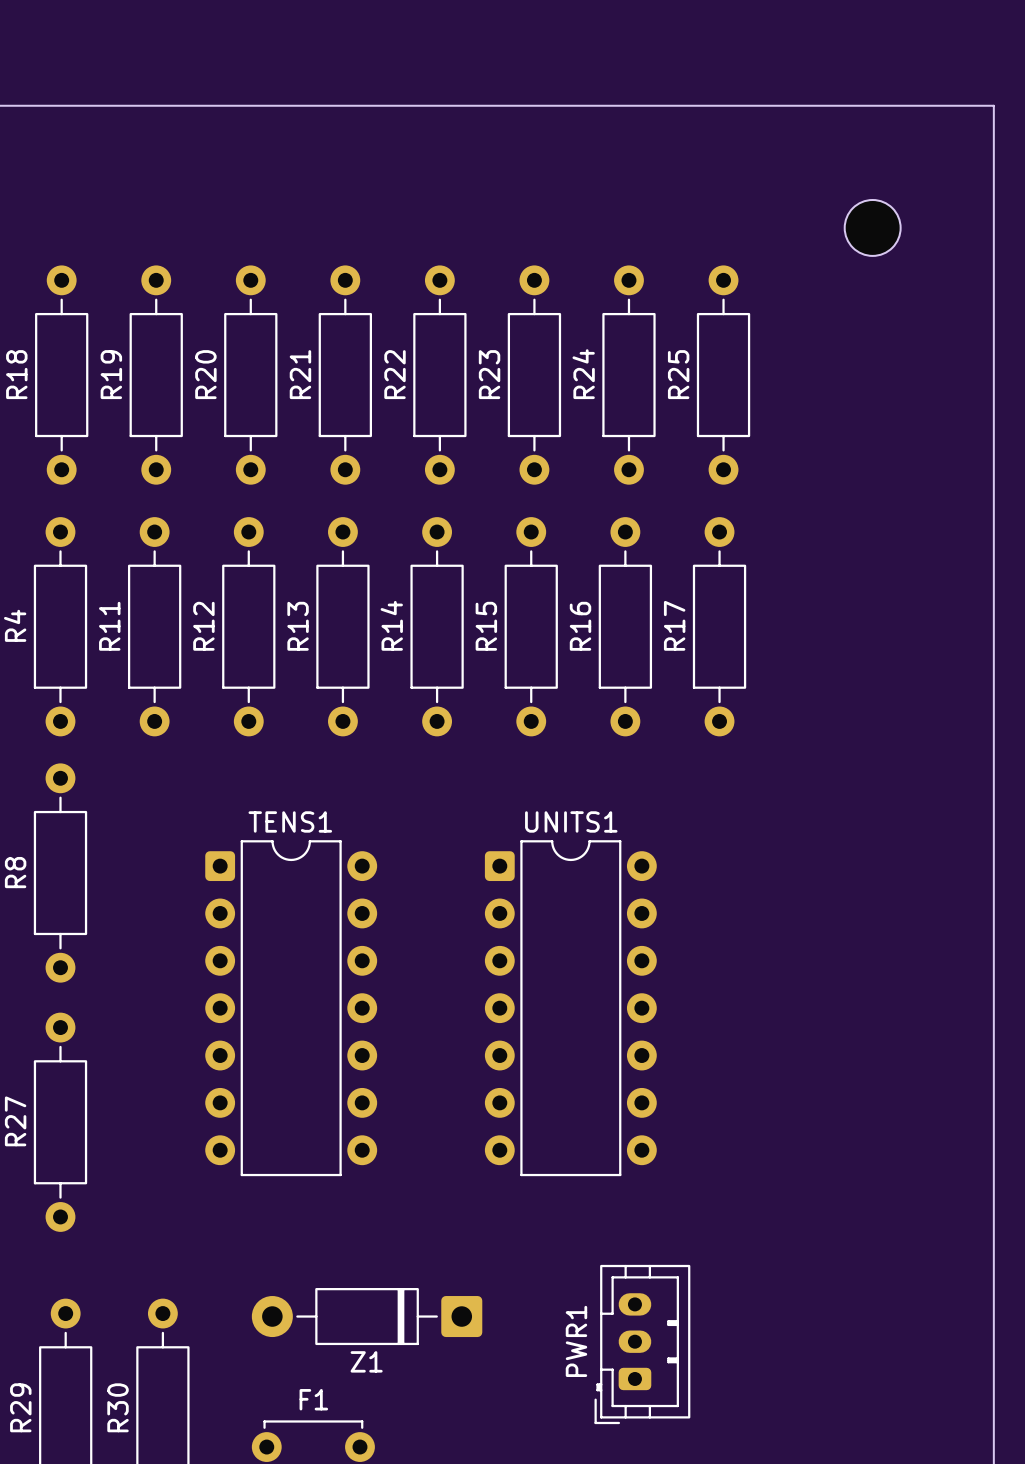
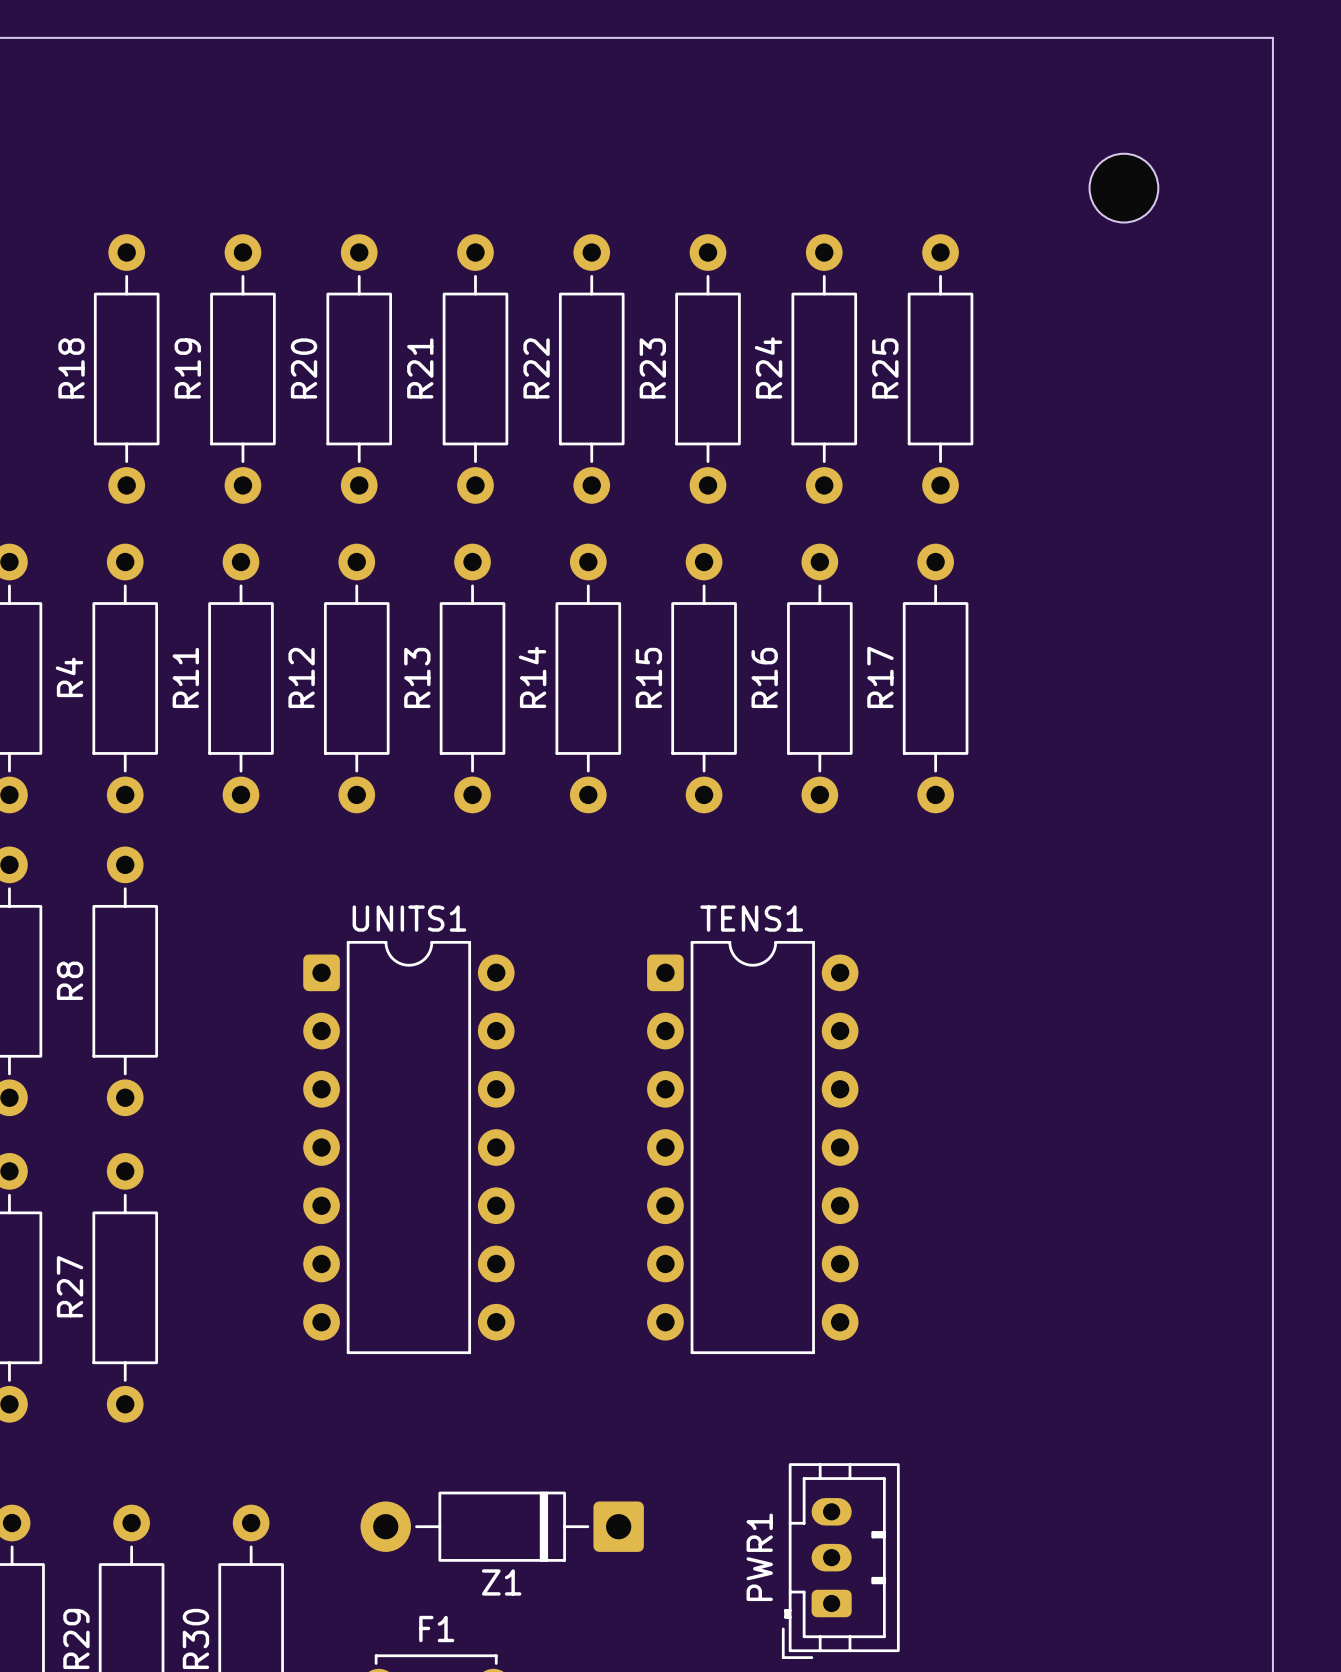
TENS1 name: TENS1 (290, 821) -> UNITS1 (409, 918)
UNITS1 name: UNITS1 (571, 821) -> TENS1 (751, 918)

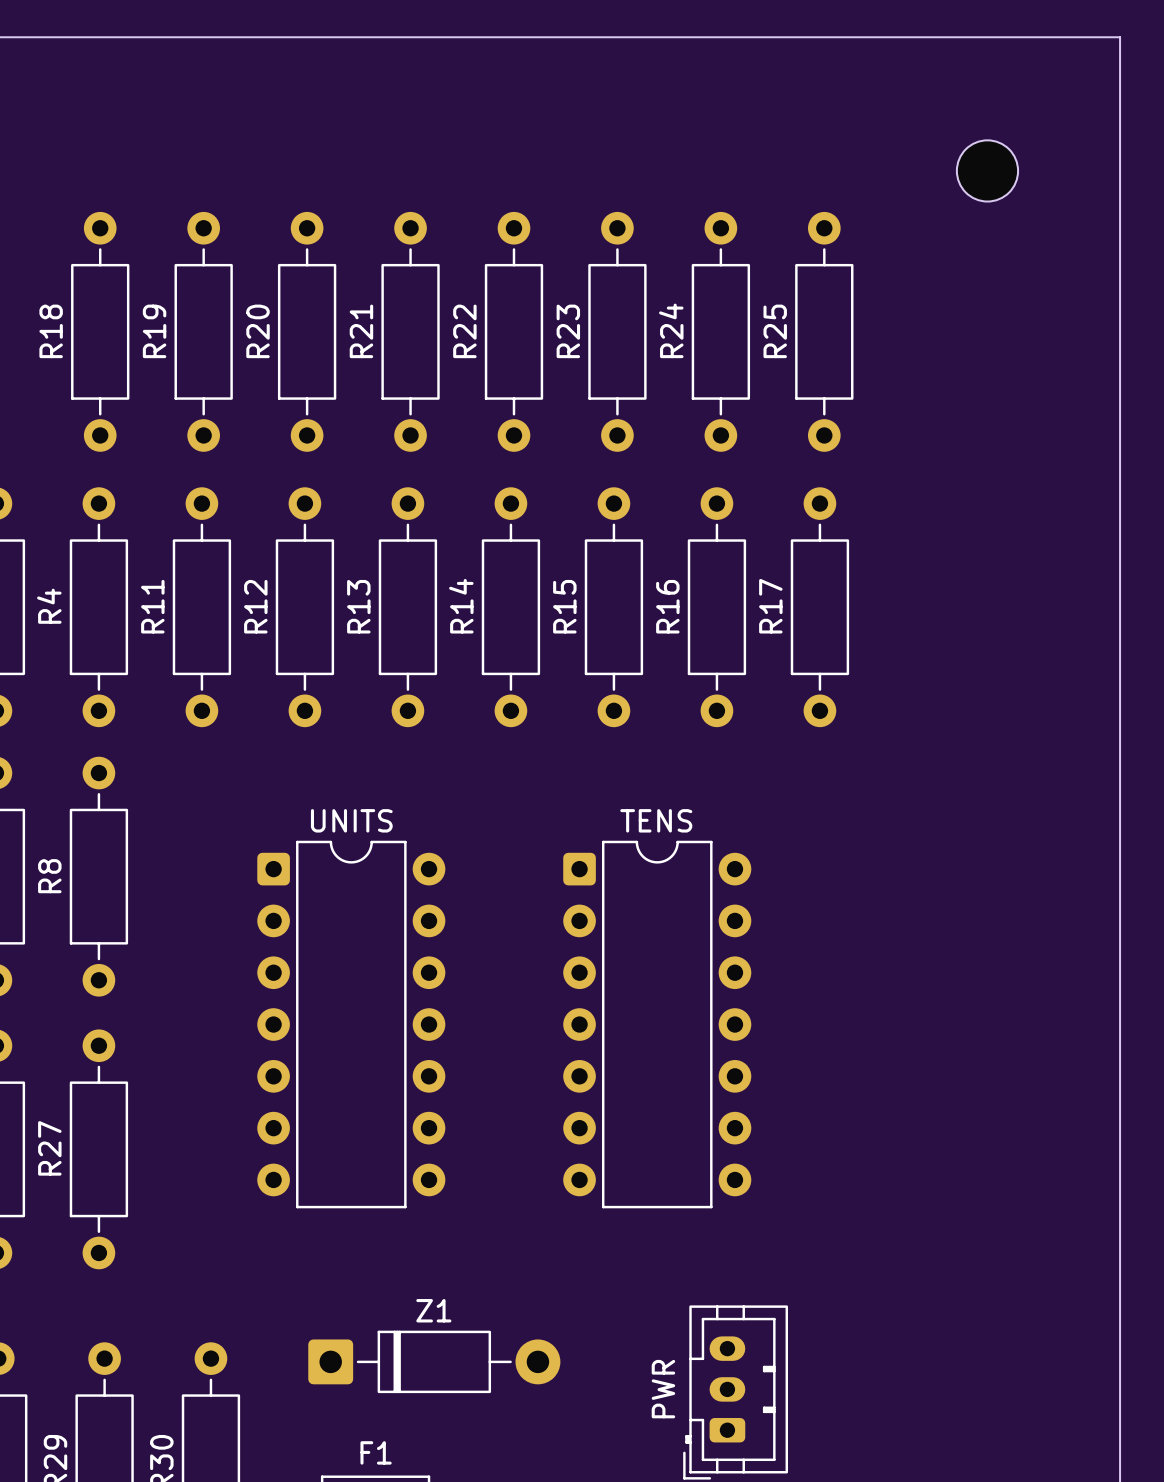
UNITS1 name: UNITS1 (409, 918) -> UNITS (351, 820)
TENS1 name: TENS1 (751, 918) -> TENS (656, 820)
Z1 rotation: 0° (502, 1526) -> 180° (434, 1361)
PWR1 name: PWR1 (759, 1557) -> PWR (663, 1389)

